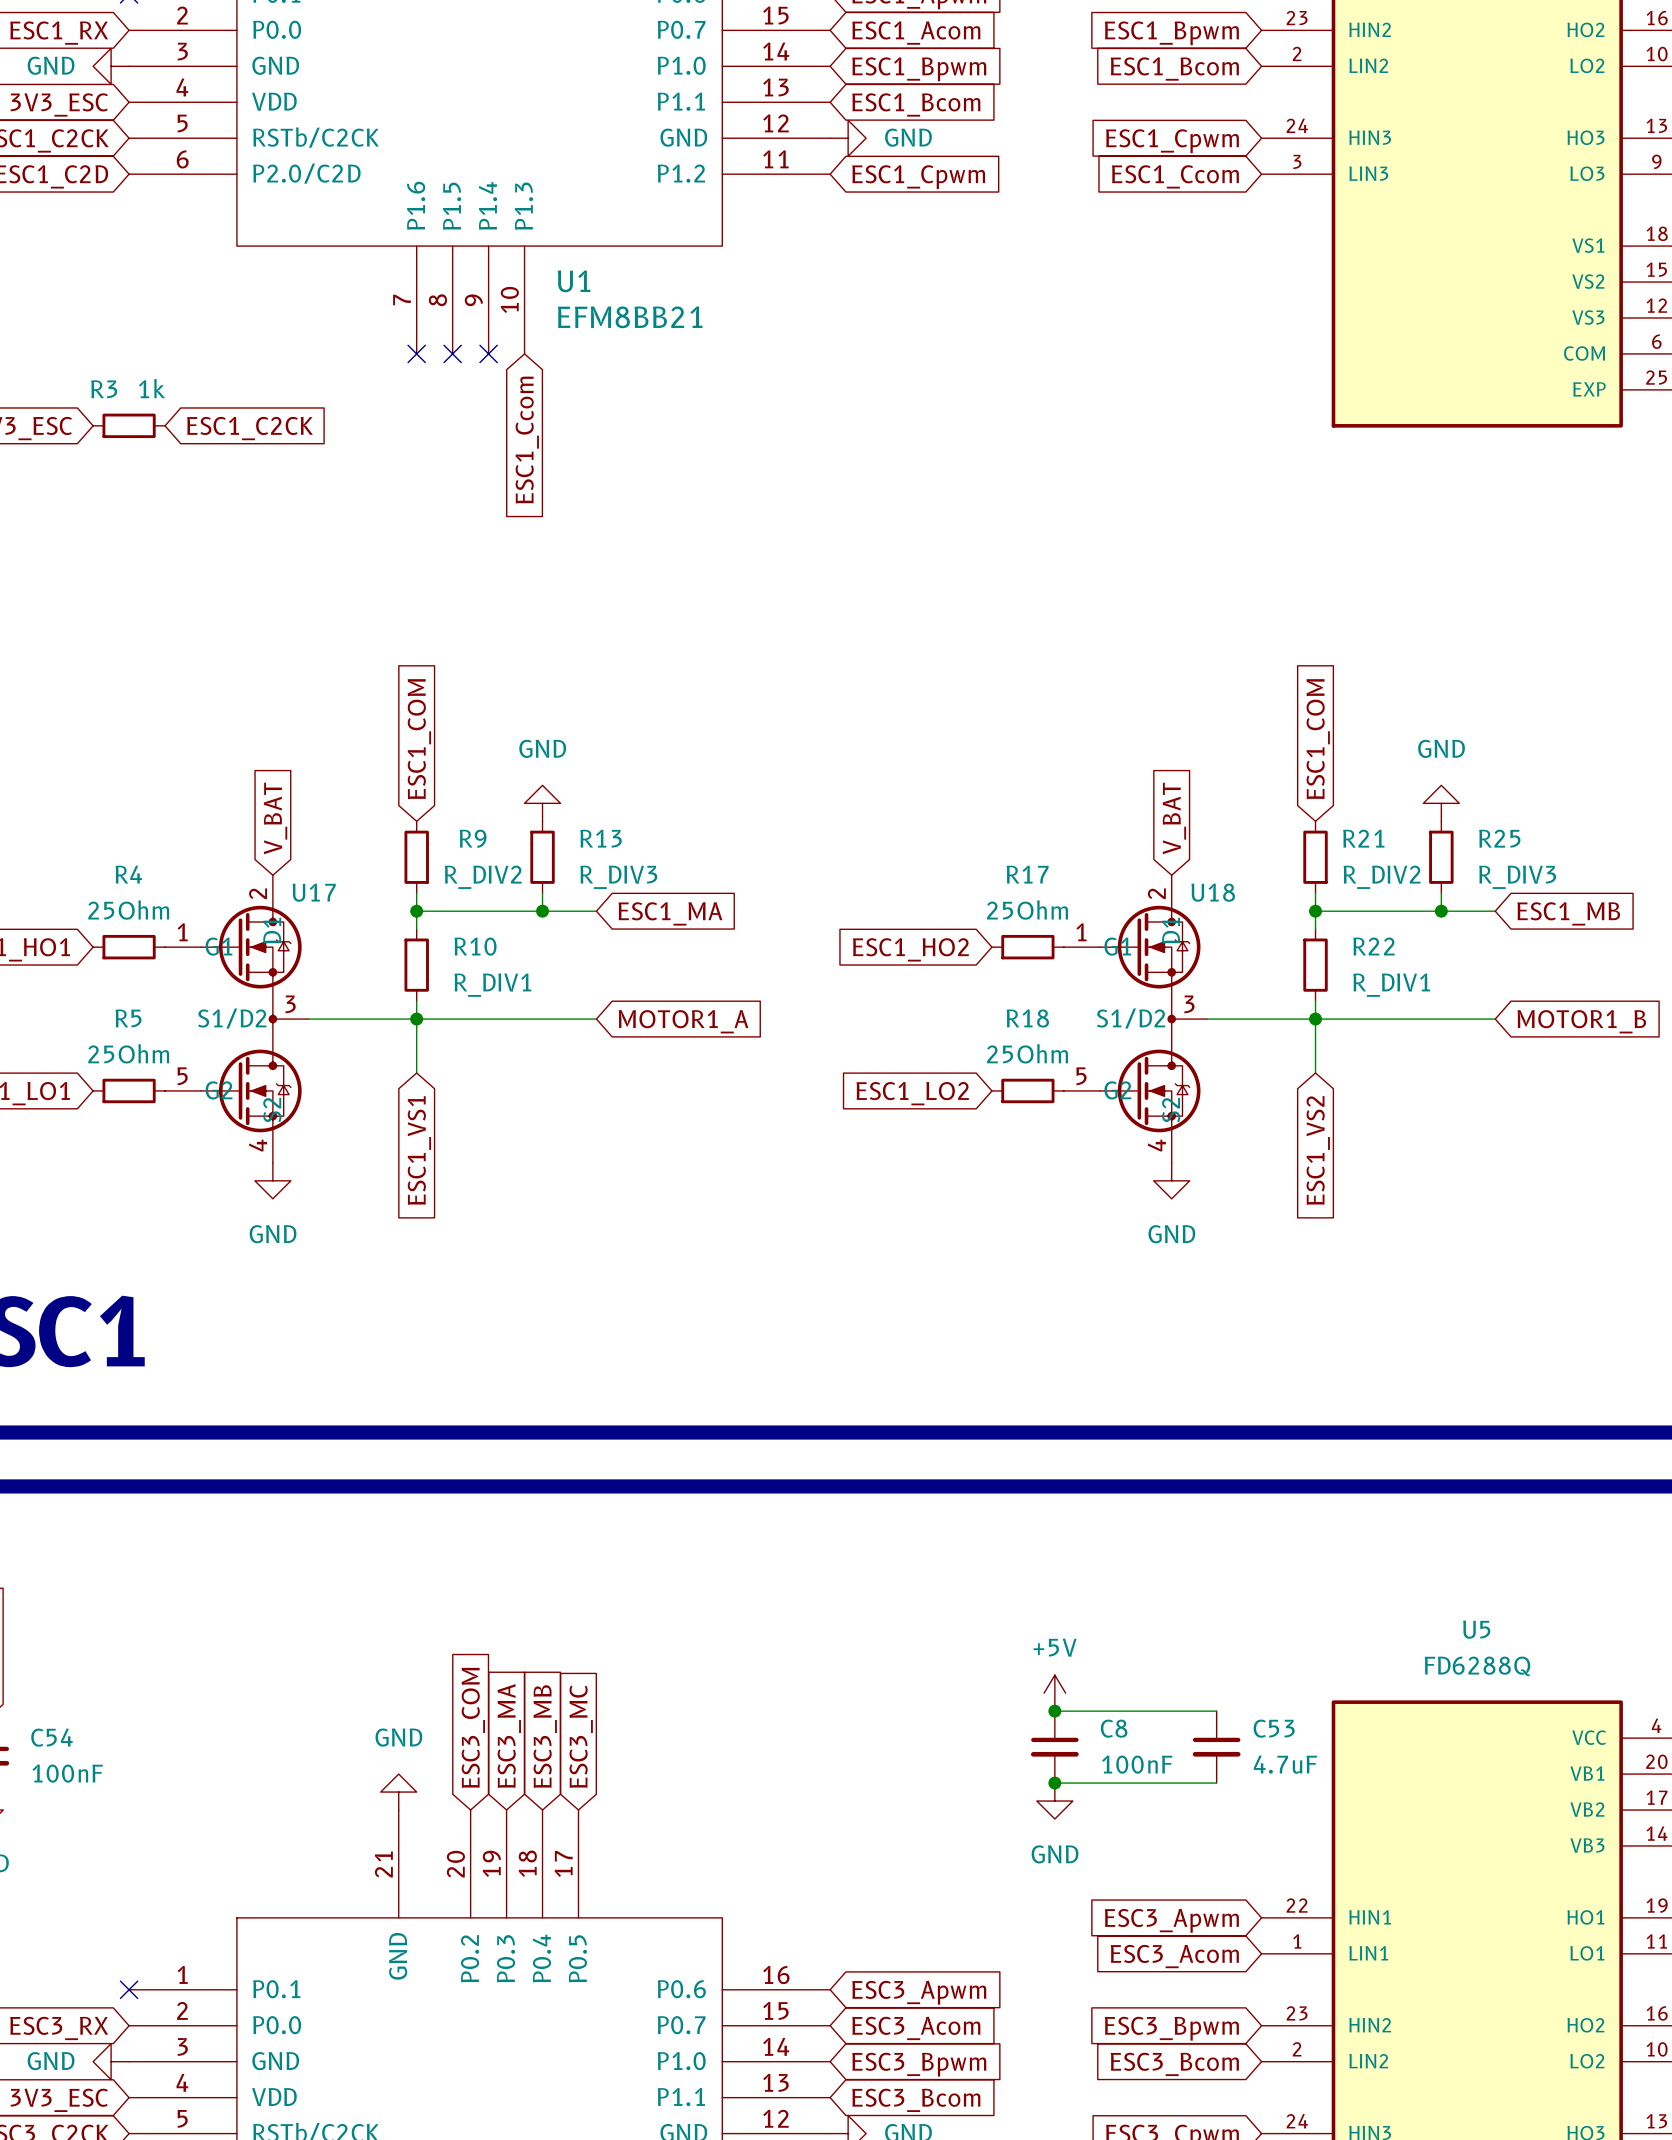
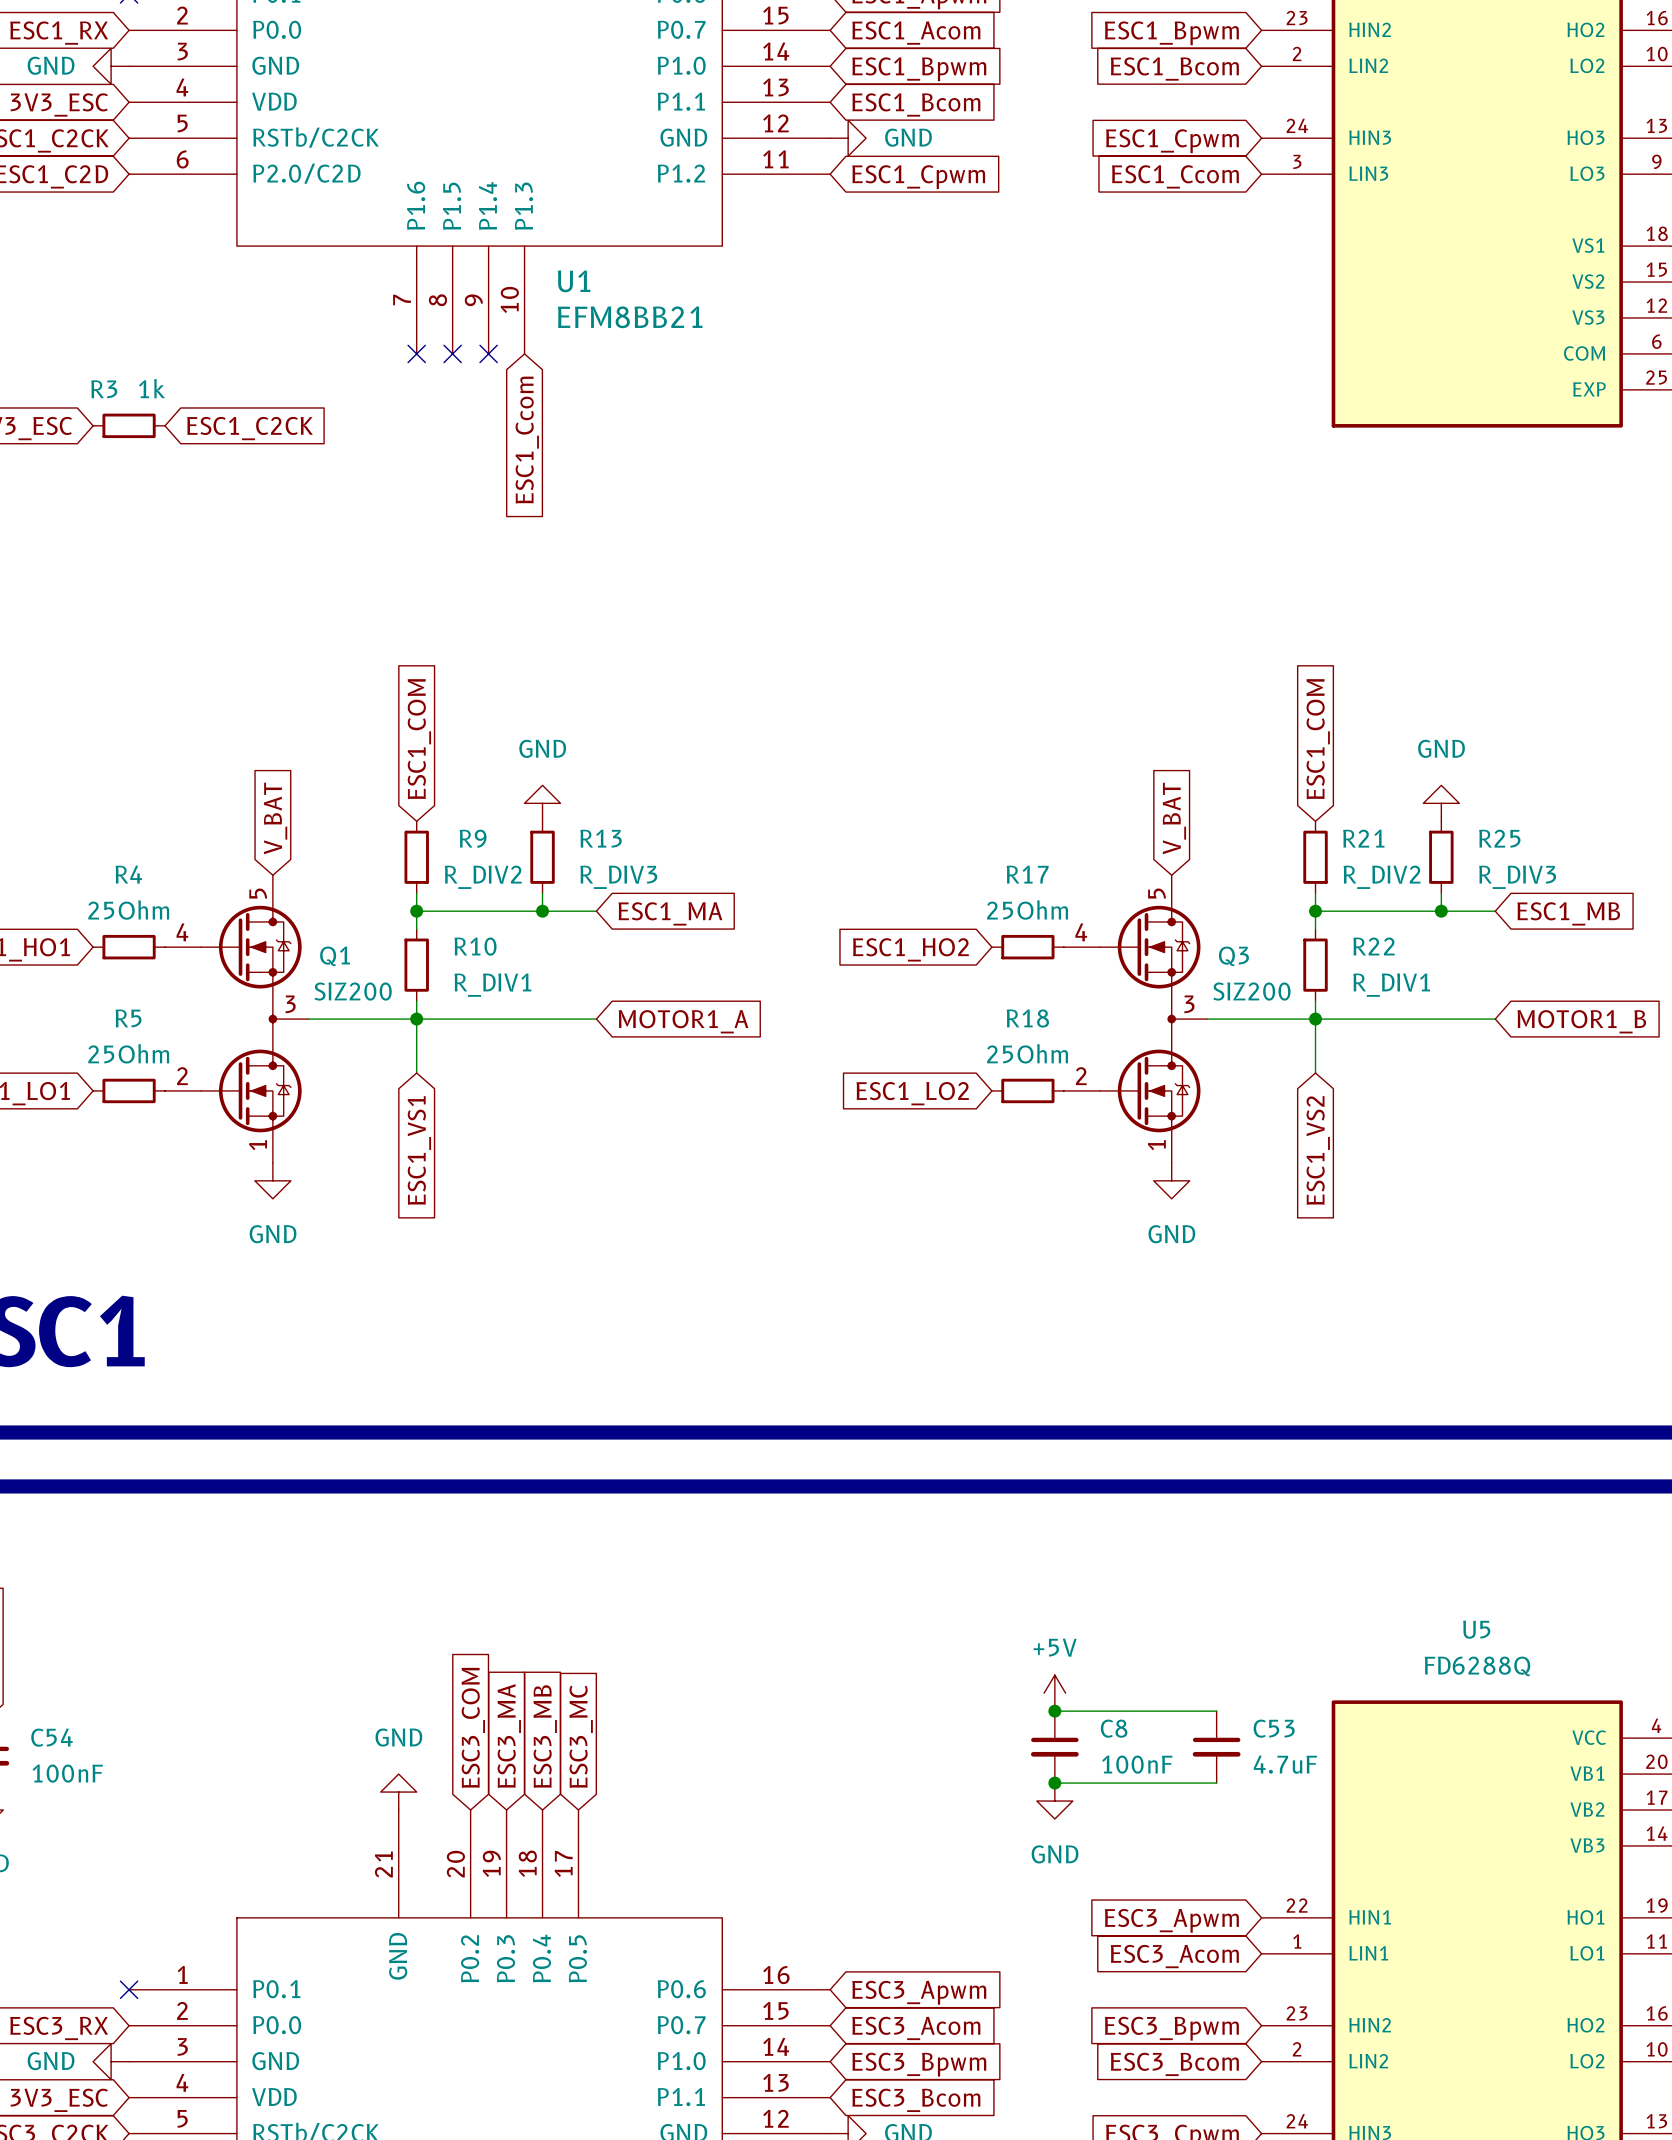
U17 symbol: [165, 875, 309, 1163] -> [165, 875, 309, 1163]
U18 symbol: [1063, 875, 1208, 1163] -> [1063, 875, 1208, 1163]
U17 name: U17 (314, 892) -> Q1 (335, 956)
U18 name: U18 (1213, 892) -> Q3 (1233, 956)
U17 value: none -> SIZ200 (353, 991)
U18 value: none -> SIZ200 (1251, 991)

